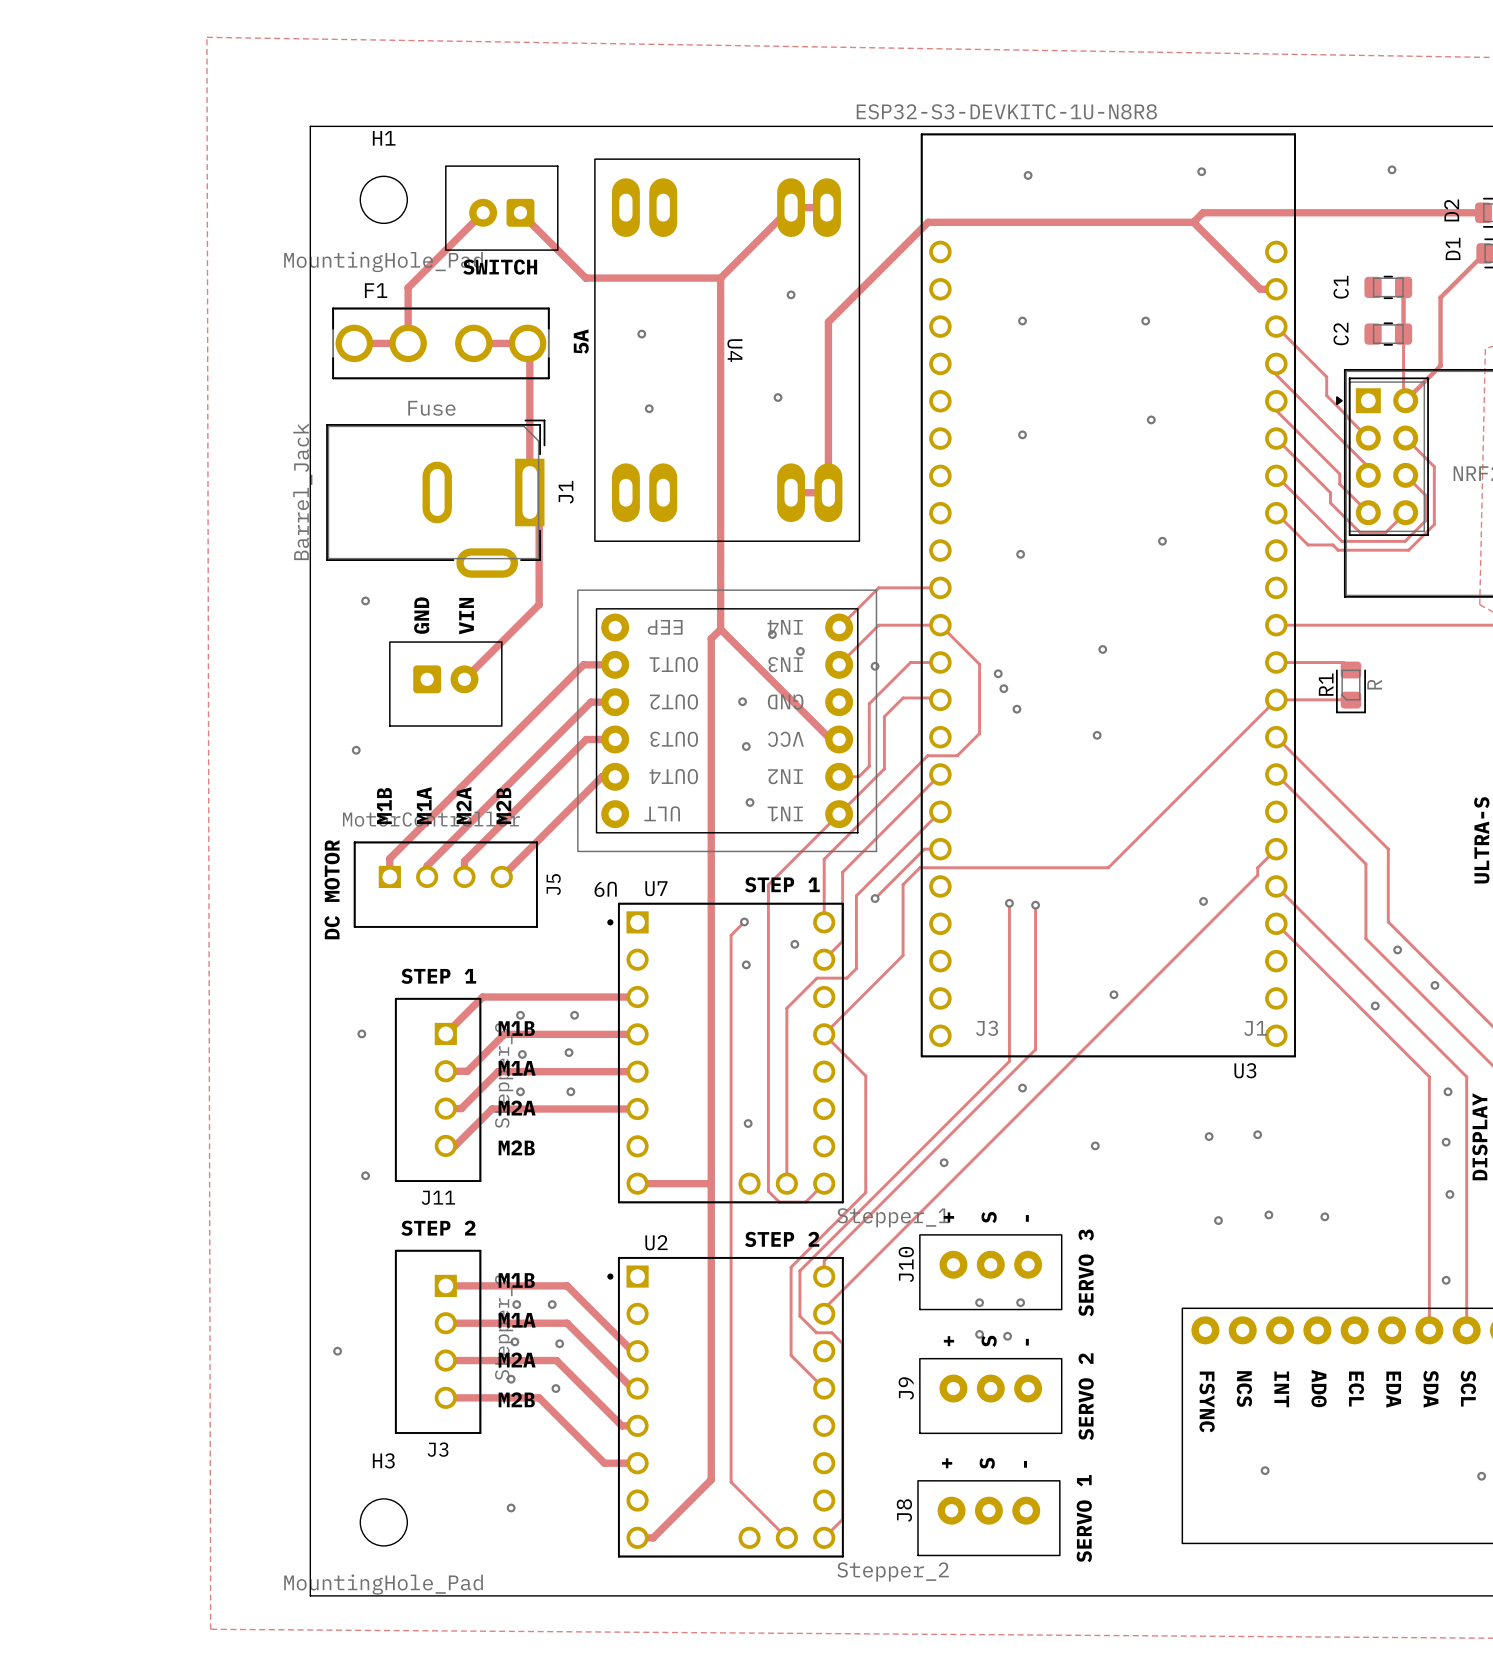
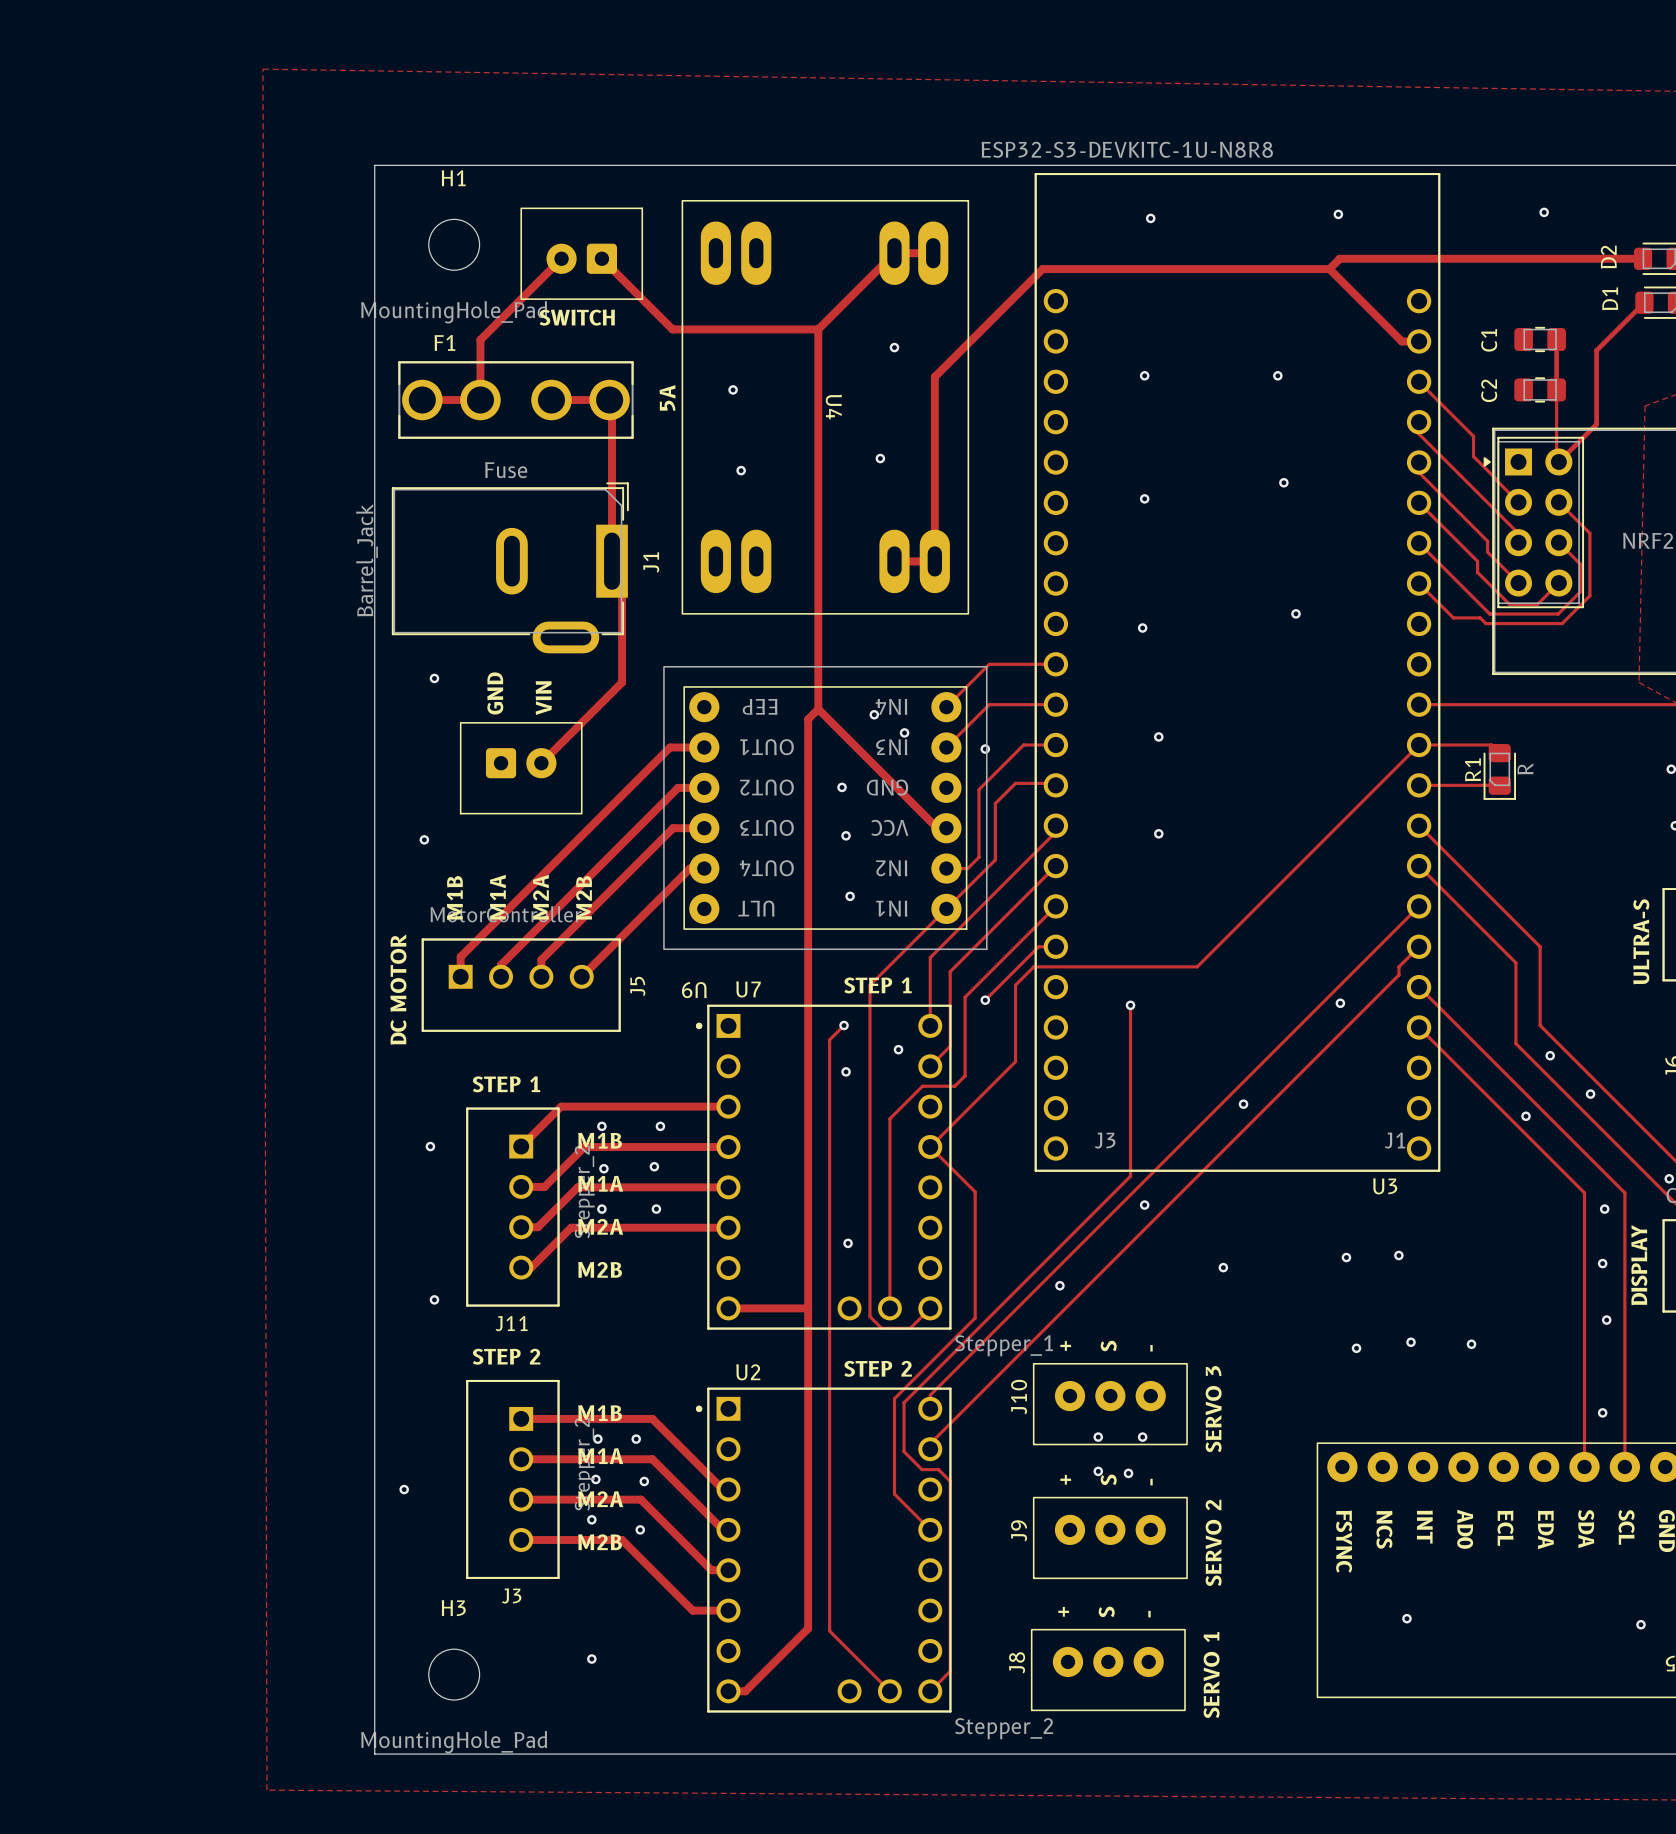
track: (940, 625) (979, 664) (979, 733) (957, 755) (927, 755) -> (1055, 832) (1042, 845)
via: (1102, 649) -> none
via: none -> (1158, 736)
via: (998, 673) -> none
via: (1003, 688) -> none
track: (1276, 699) (1108, 867) (1071, 867) -> (1419, 745) (1197, 966)
via: (1016, 709) -> none
via: (1097, 735) -> none
via: none -> (1158, 833)
track: (1035, 905) (1035, 1049) (824, 1260) (824, 1263) -> (1419, 906) (930, 1395)
via: (1035, 905) -> none

